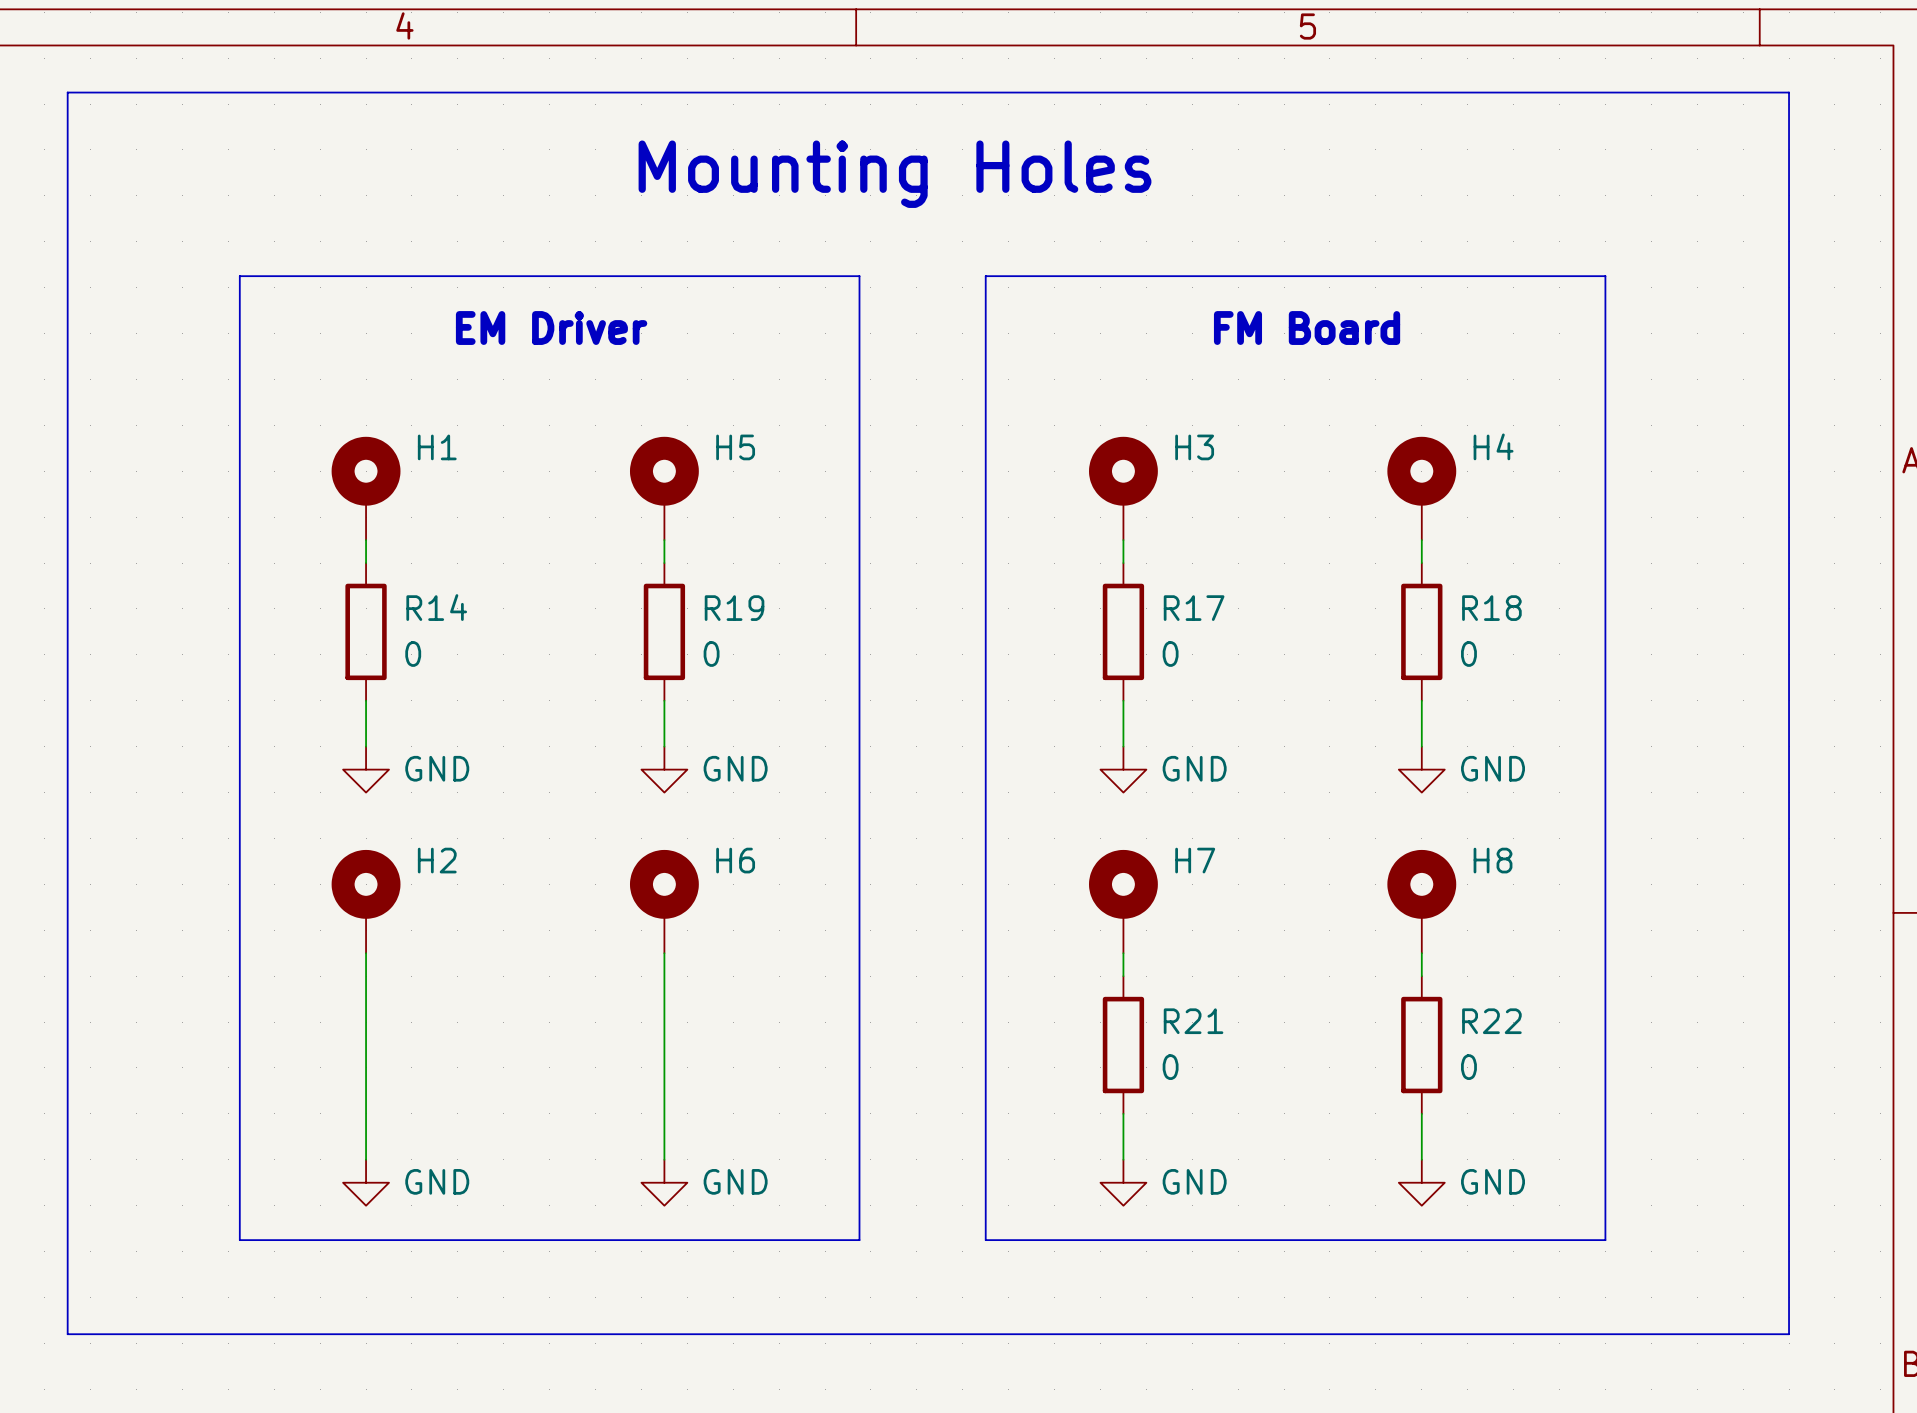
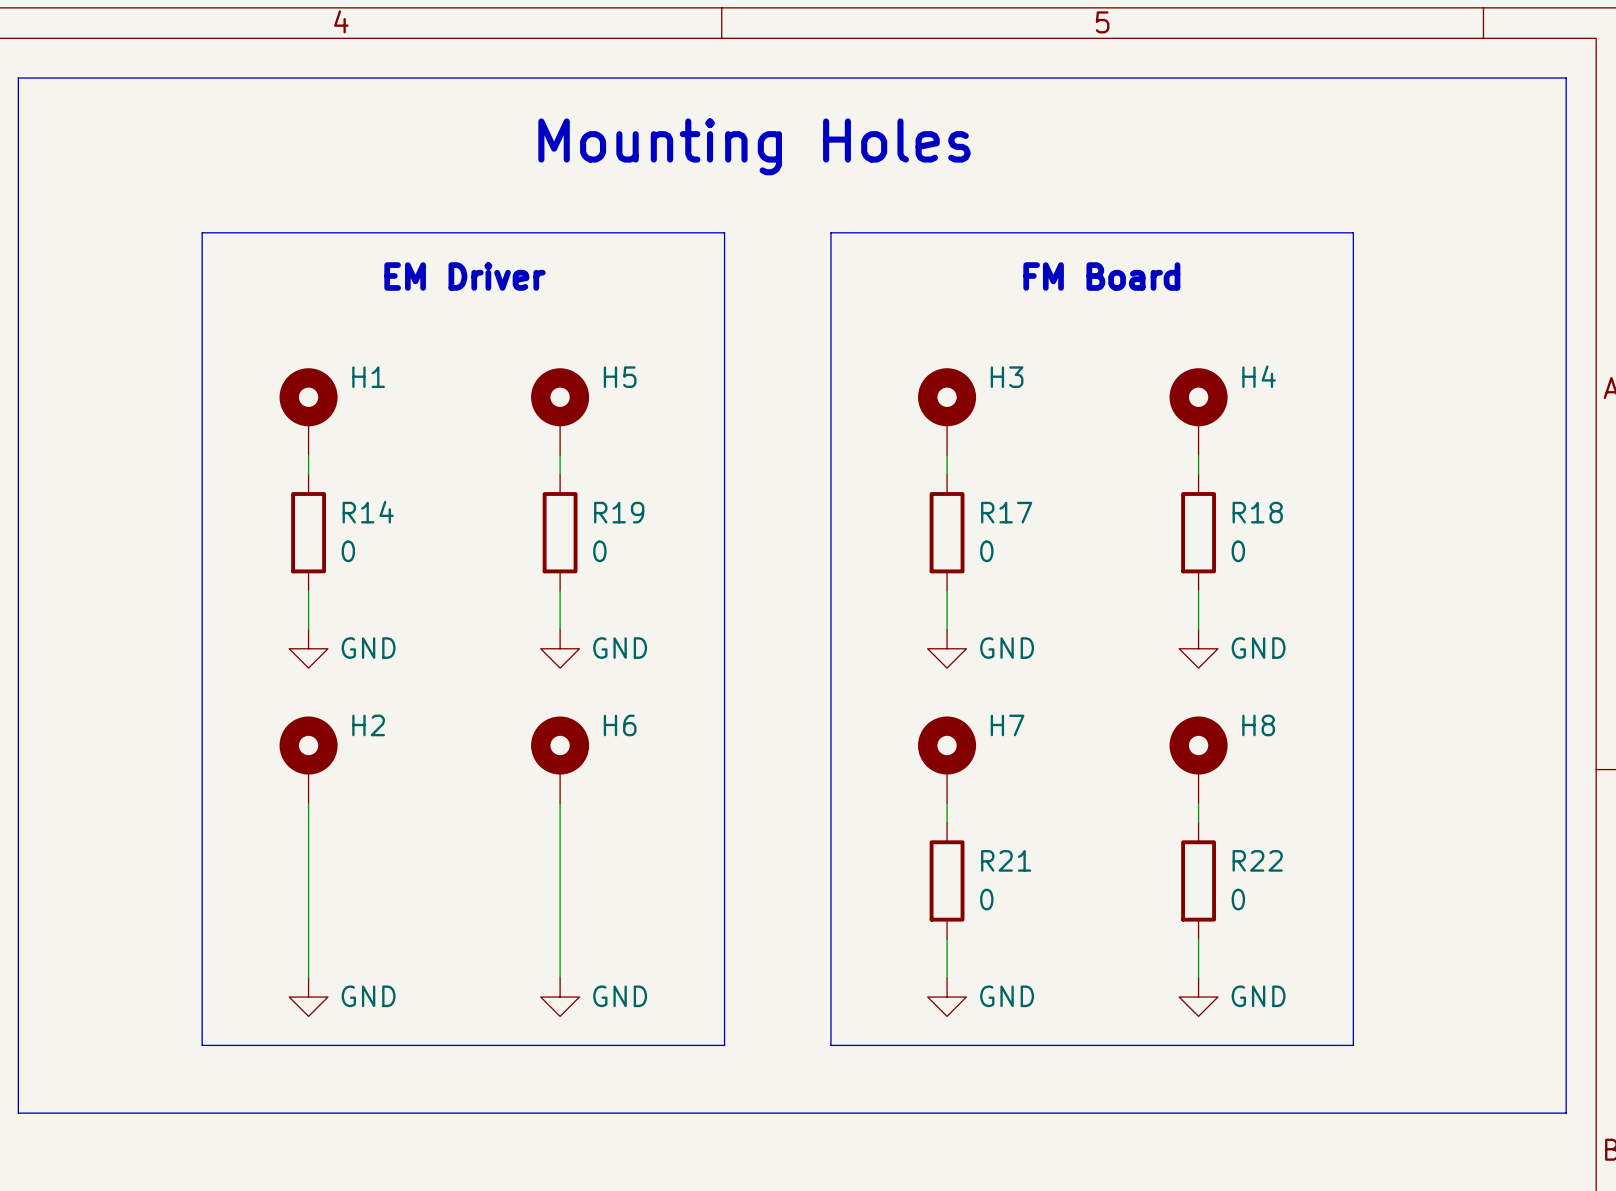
line: (67, 92) (67, 1334) (1789, 1334) (1789, 92) -> (57, 78) (18, 78) (18, 1113) (1566, 1113) (1566, 78) (1508, 78)

